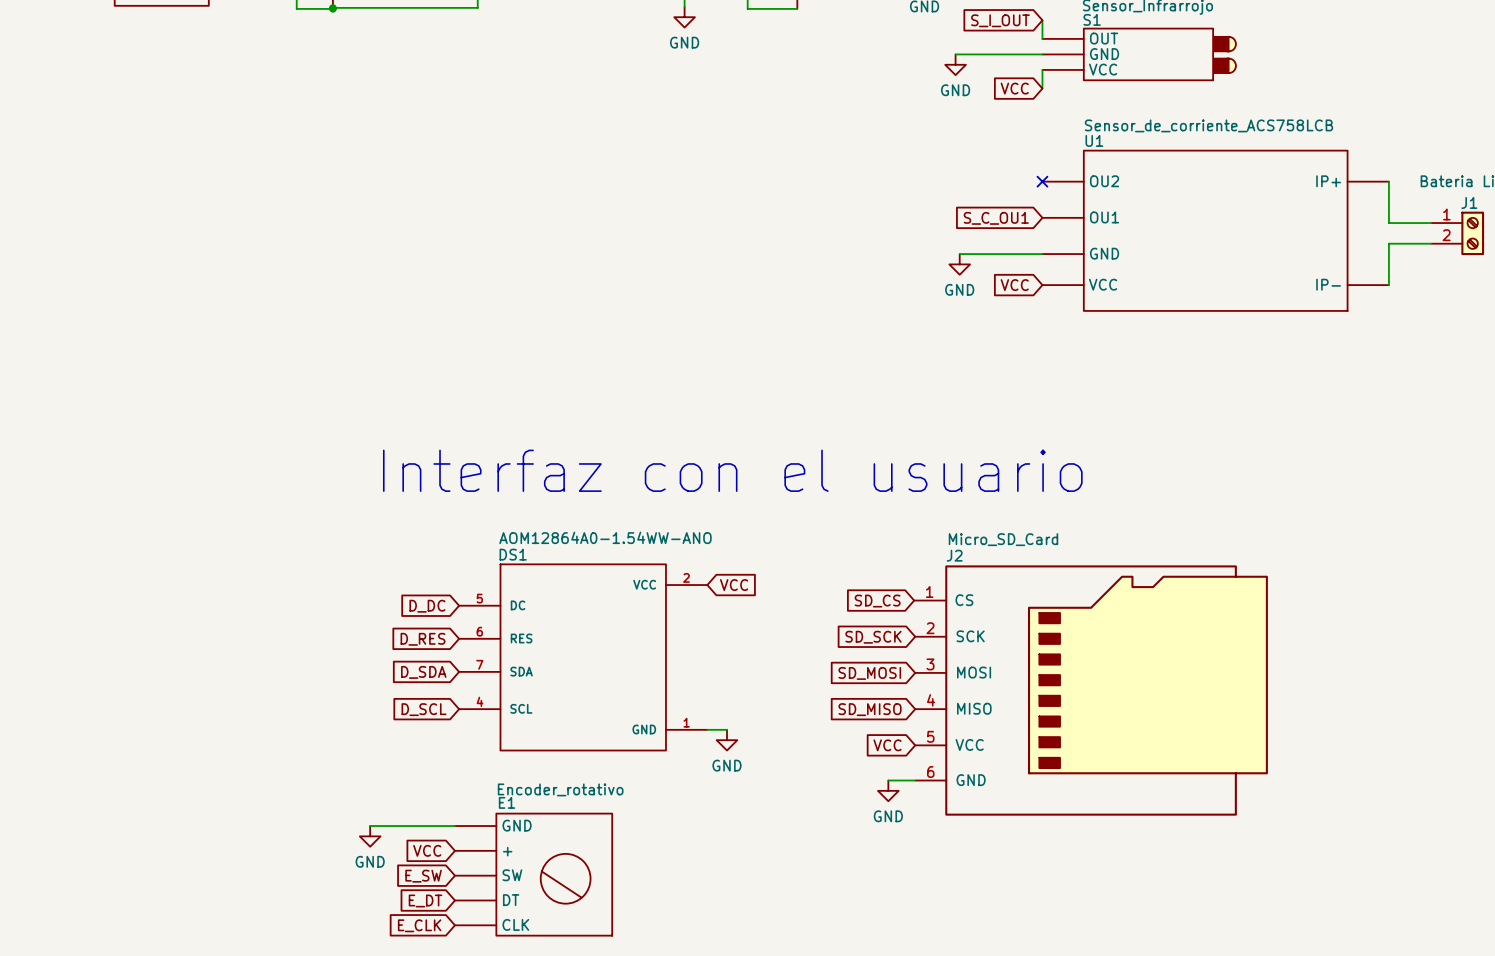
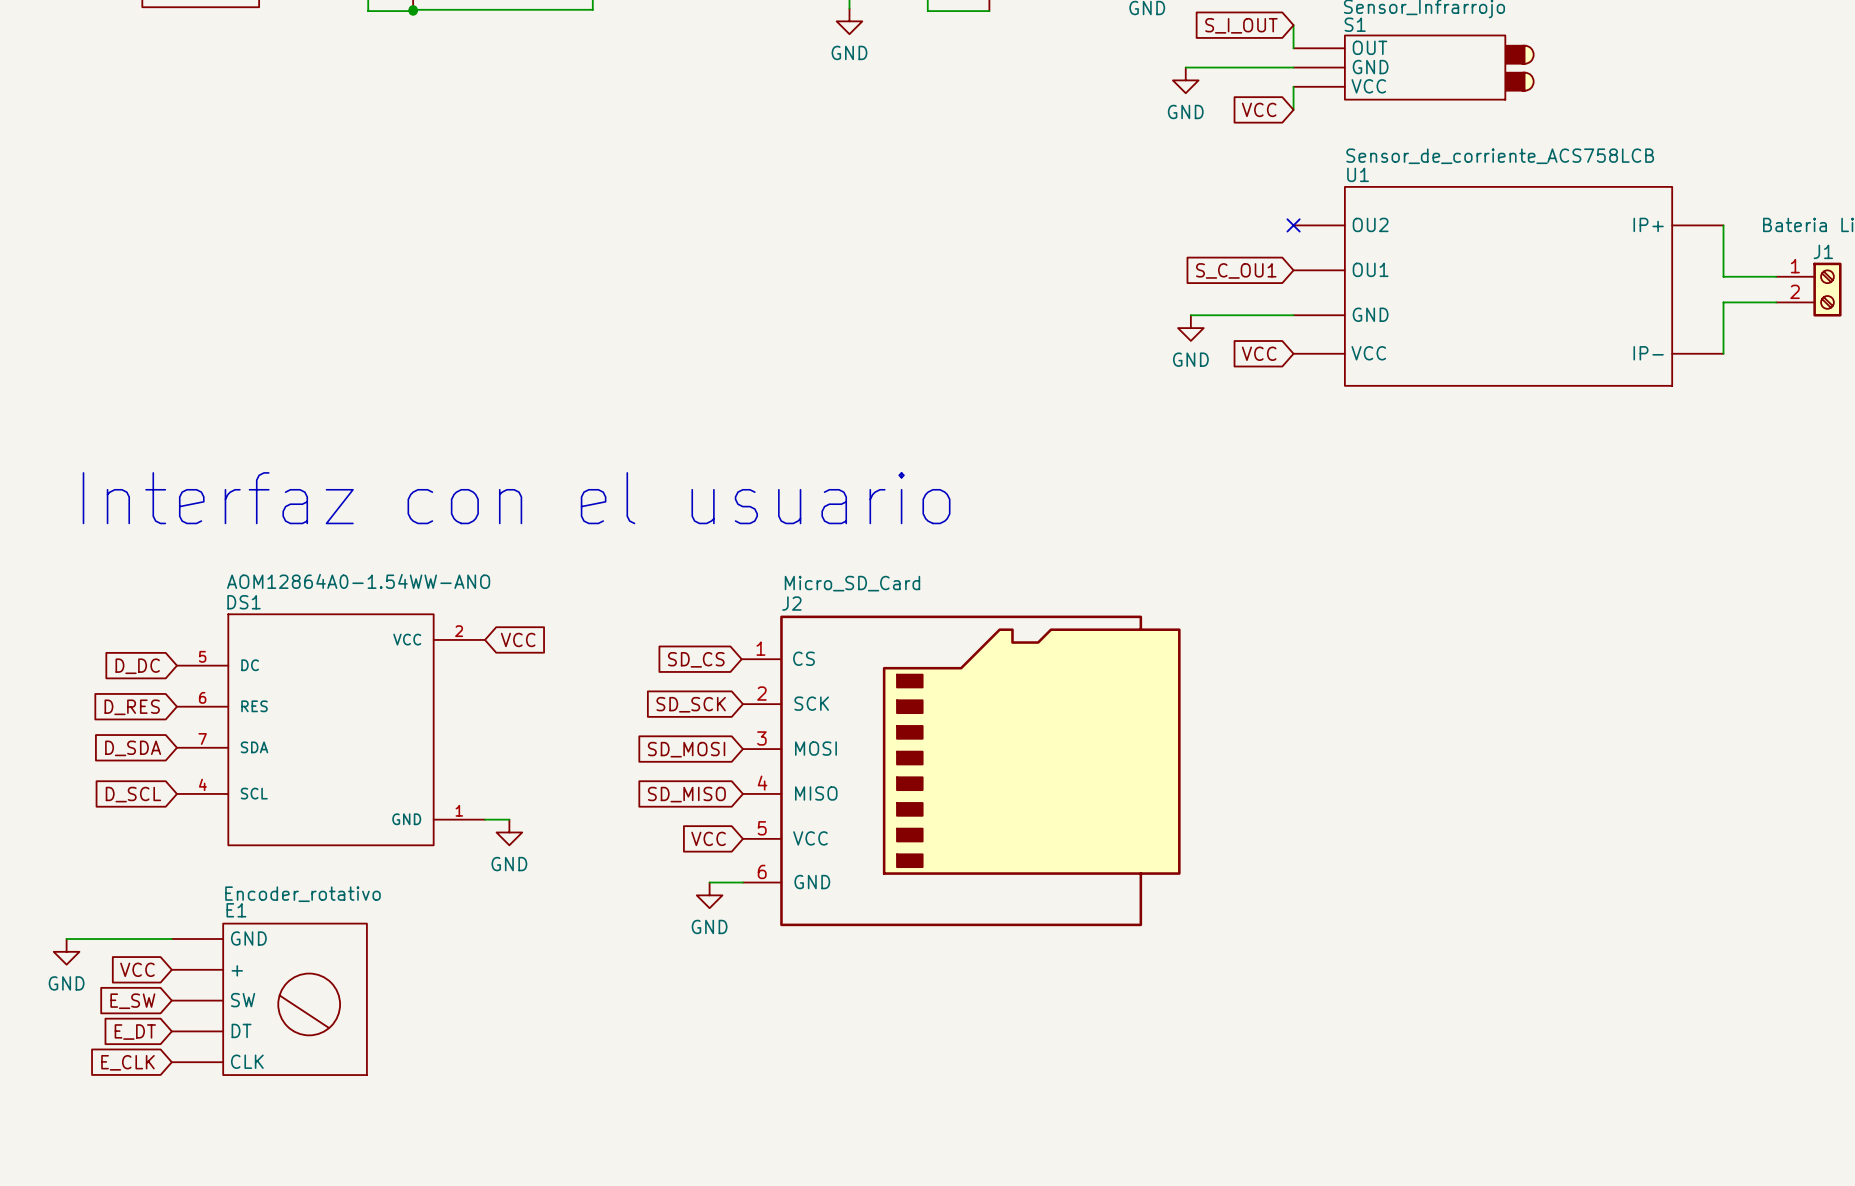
text: none -> Interfaz con el usuario (516, 498)
text: Interfaz con el usuario (732, 470) -> none
global label: none -> VCC (518, 639)
global label: none -> SD_CS (696, 659)
global label: none -> D_DC (137, 666)
global label: none -> SD_SCK (691, 704)
global label: none -> D_RES (132, 707)
global label: VCC (734, 585) -> none
global label: SD_CS (877, 601) -> none
global label: none -> D_SDA (133, 748)
global label: none -> SD_MOSI (686, 749)
global label: D_DC (427, 606) -> none
global label: SD_SCK (873, 637) -> none
global label: D_RES (423, 639) -> none
global label: none -> D_SCL (133, 794)
global label: none -> SD_MISO (686, 794)
DS1 position: (583, 657) -> (330, 729)
wire: none -> (485, 819) (509, 819)
power symbol: none -> GND (509, 832)
global label: D_SDA (423, 672) -> none
global label: SD_MOSI (869, 673) -> none
global label: none -> VCC (708, 838)
J2 position: (1091, 690) -> (961, 770)
global label: D_SCL (424, 709) -> none
global label: SD_MISO (870, 709) -> none
wire: none -> (709, 882) (742, 882)
power symbol: none -> GND (709, 895)
wire: (707, 729) (726, 729) -> none
power symbol: GND (726, 740) -> none
global label: VCC (887, 745) -> none
wire: none -> (66, 939) (171, 939)
power symbol: none -> GND (66, 951)
wire: (888, 780) (915, 780) -> none
global label: none -> VCC (137, 969)
power symbol: GND (888, 790) -> none
global label: none -> E_SW (132, 1001)
wire: (370, 826) (454, 826) -> none
global label: none -> E_DT (135, 1032)
power symbol: GND (370, 836) -> none
global label: VCC (427, 850) -> none
global label: none -> E_CLK (127, 1062)
E1 position: (533, 874) -> (269, 999)
global label: E_SW (423, 876) -> none
global label: E_DT (425, 900) -> none
global label: E_CLK (419, 925) -> none

